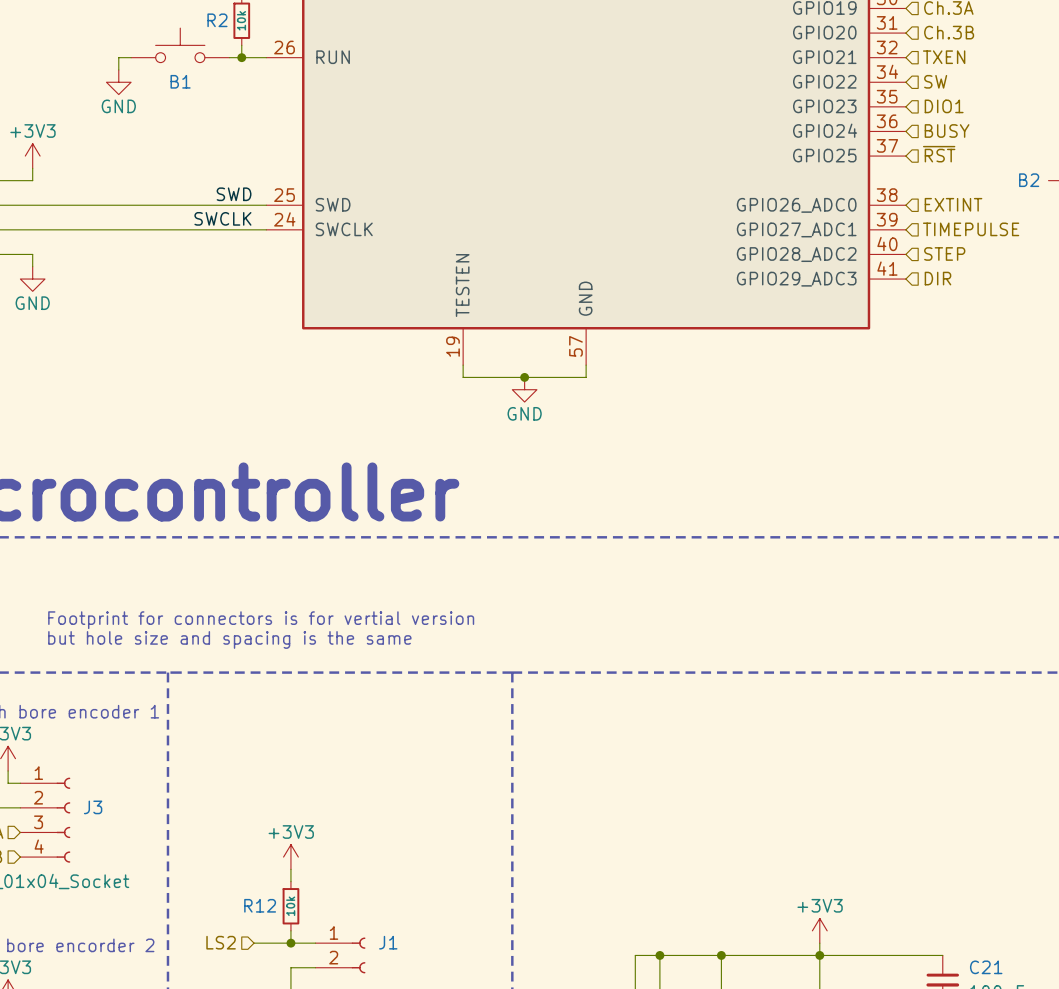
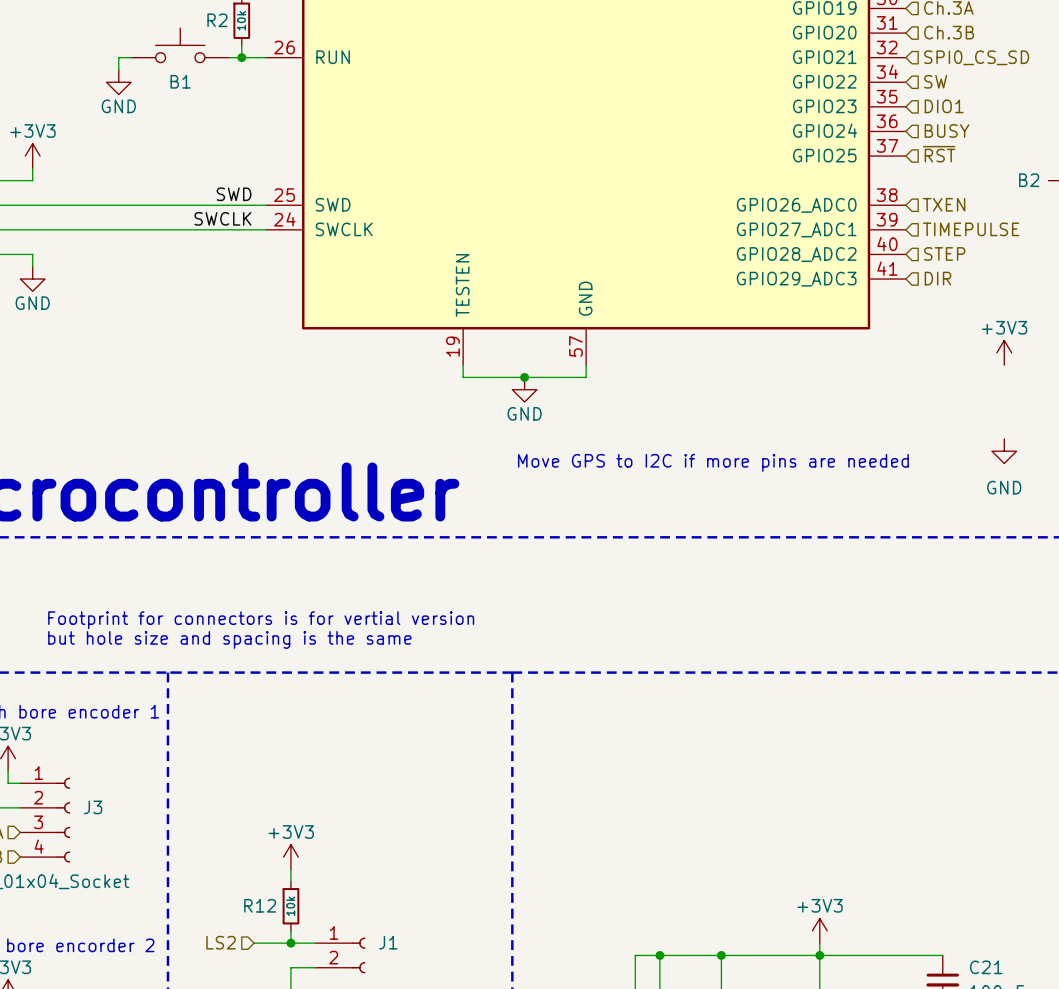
hierarchical label: TXEN (944, 57) -> SPI0_CS_SD (976, 57)
hierarchical label: EXTINT (953, 204) -> TXEN (944, 204)
power symbol: none -> +3V3 (1004, 352)
power symbol: none -> GND (1004, 451)
text: none -> Move GPS to I2C if more pins are needed (713, 462)

